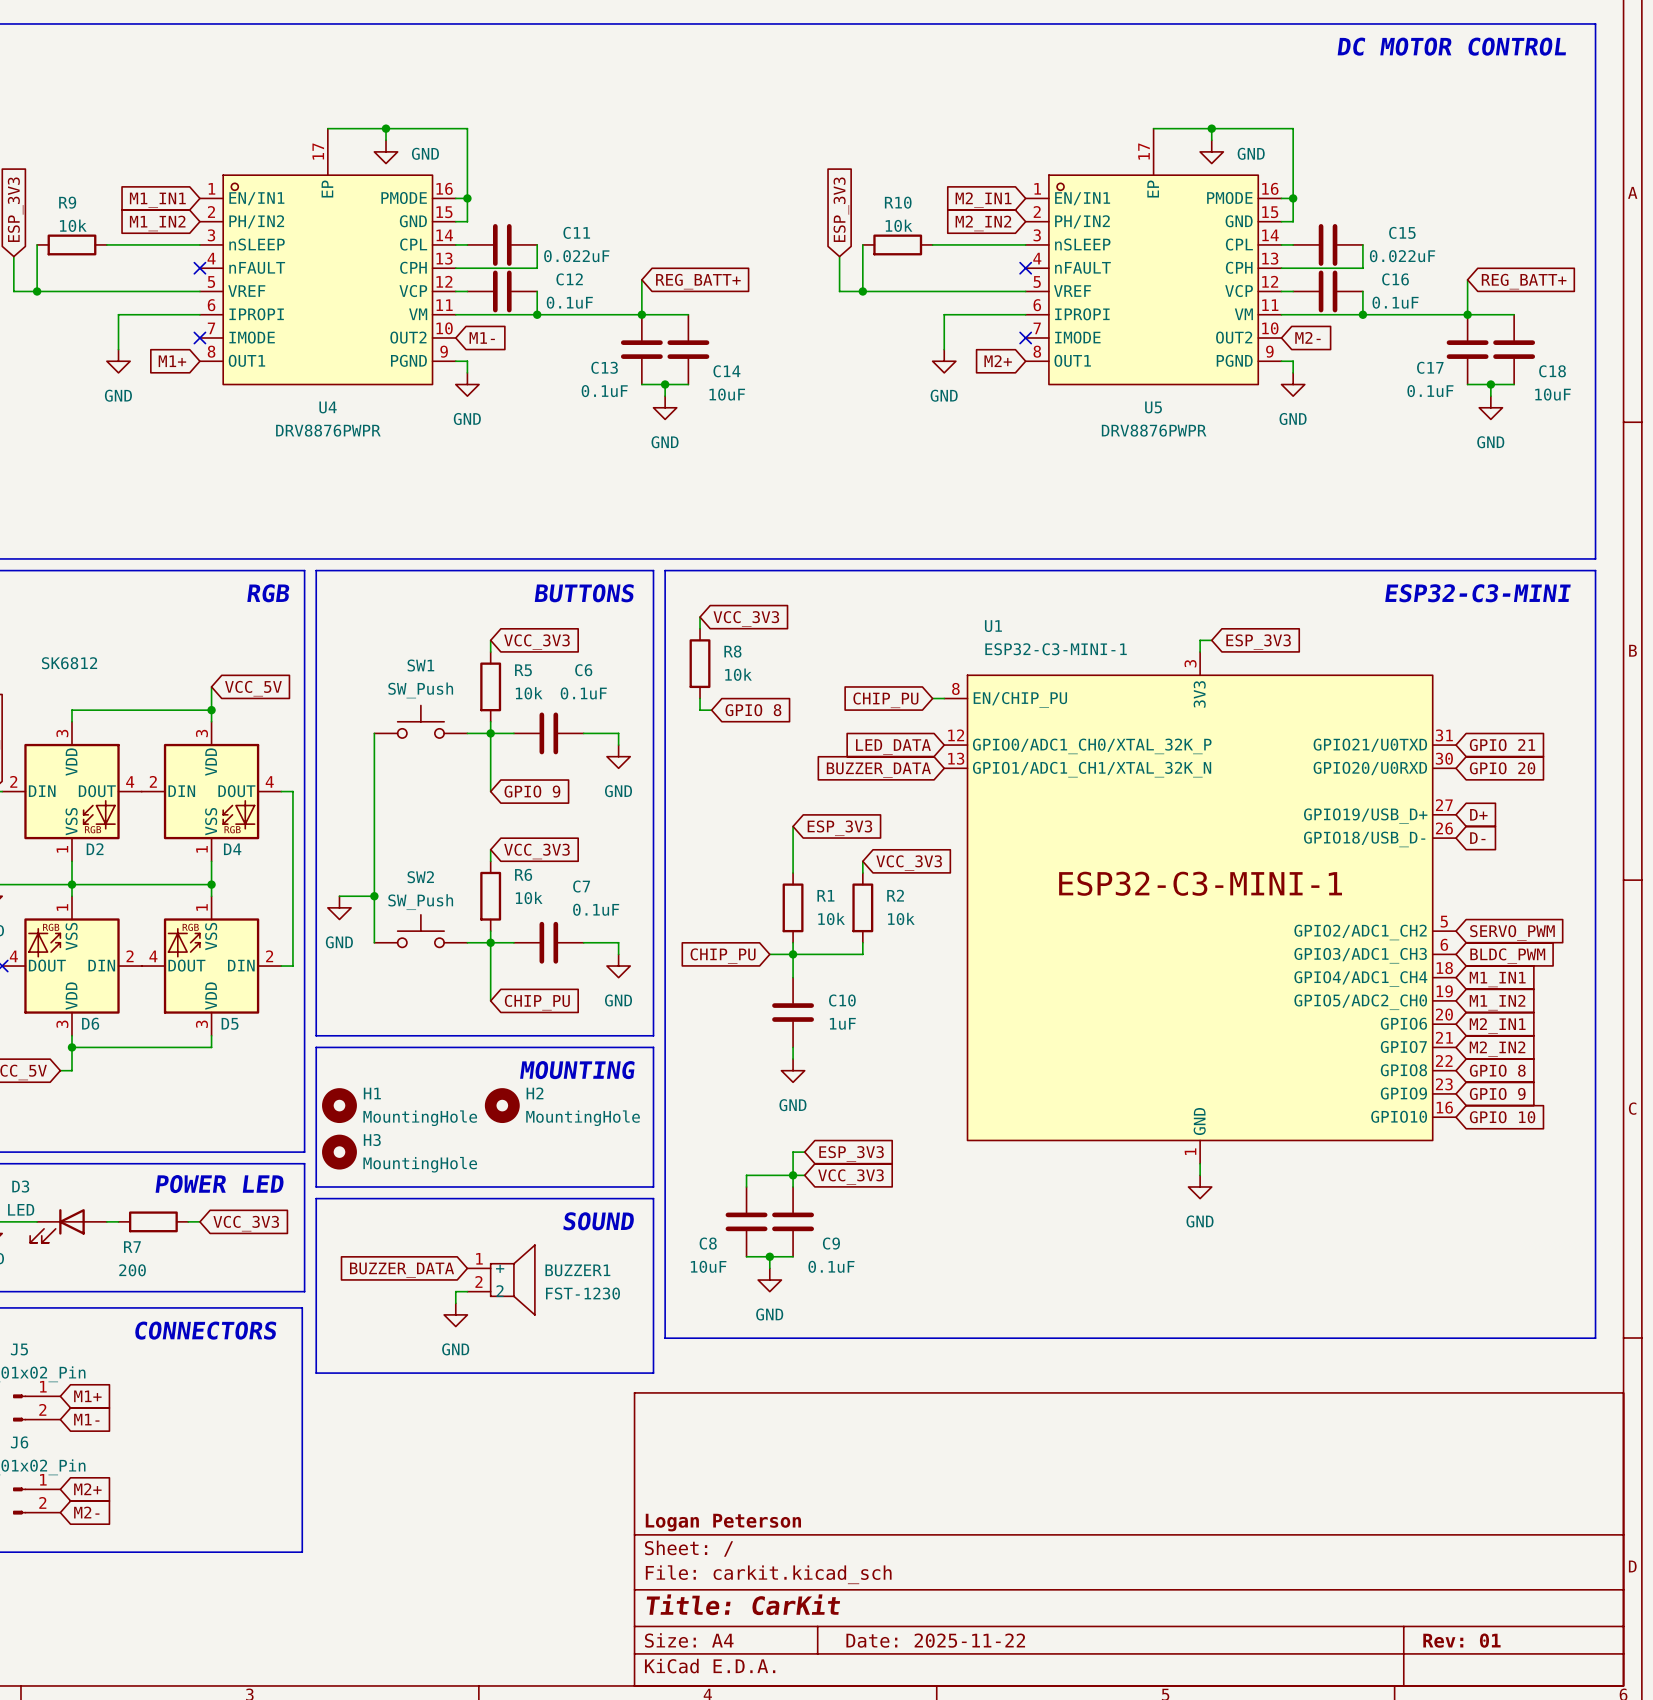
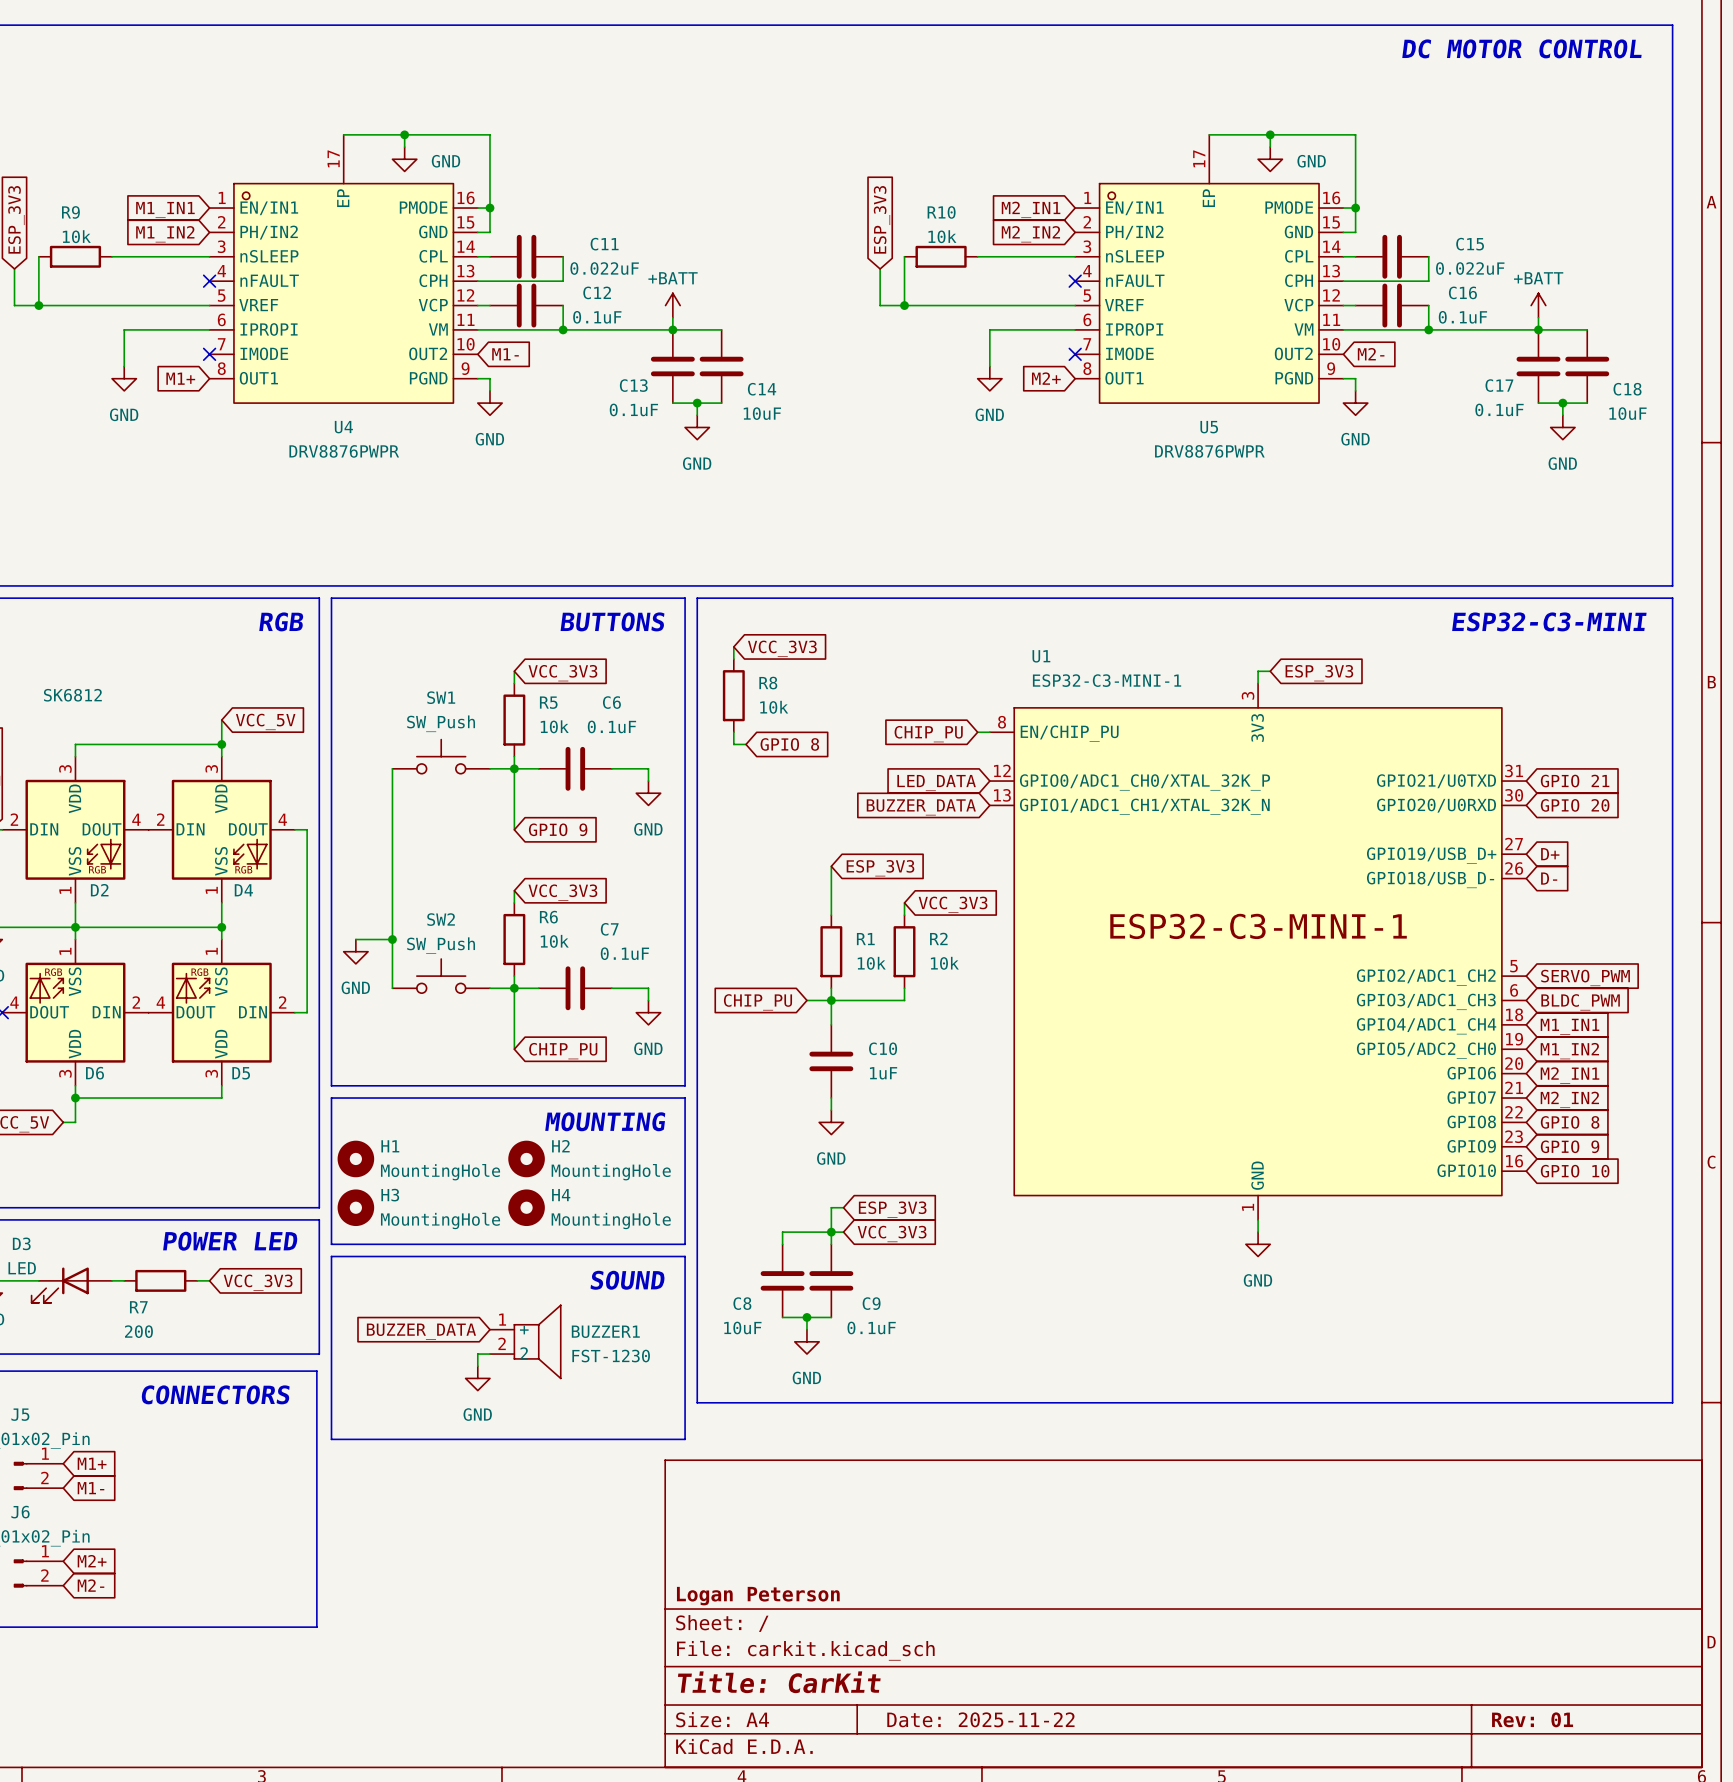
global label: REG_BATT+ (698, 281) -> none
global label: REG_BATT+ (1524, 281) -> none
power symbol: none -> +BATT (672, 305)
power symbol: none -> +BATT (1538, 305)
H4: none -> MountingHole (526, 1207)

